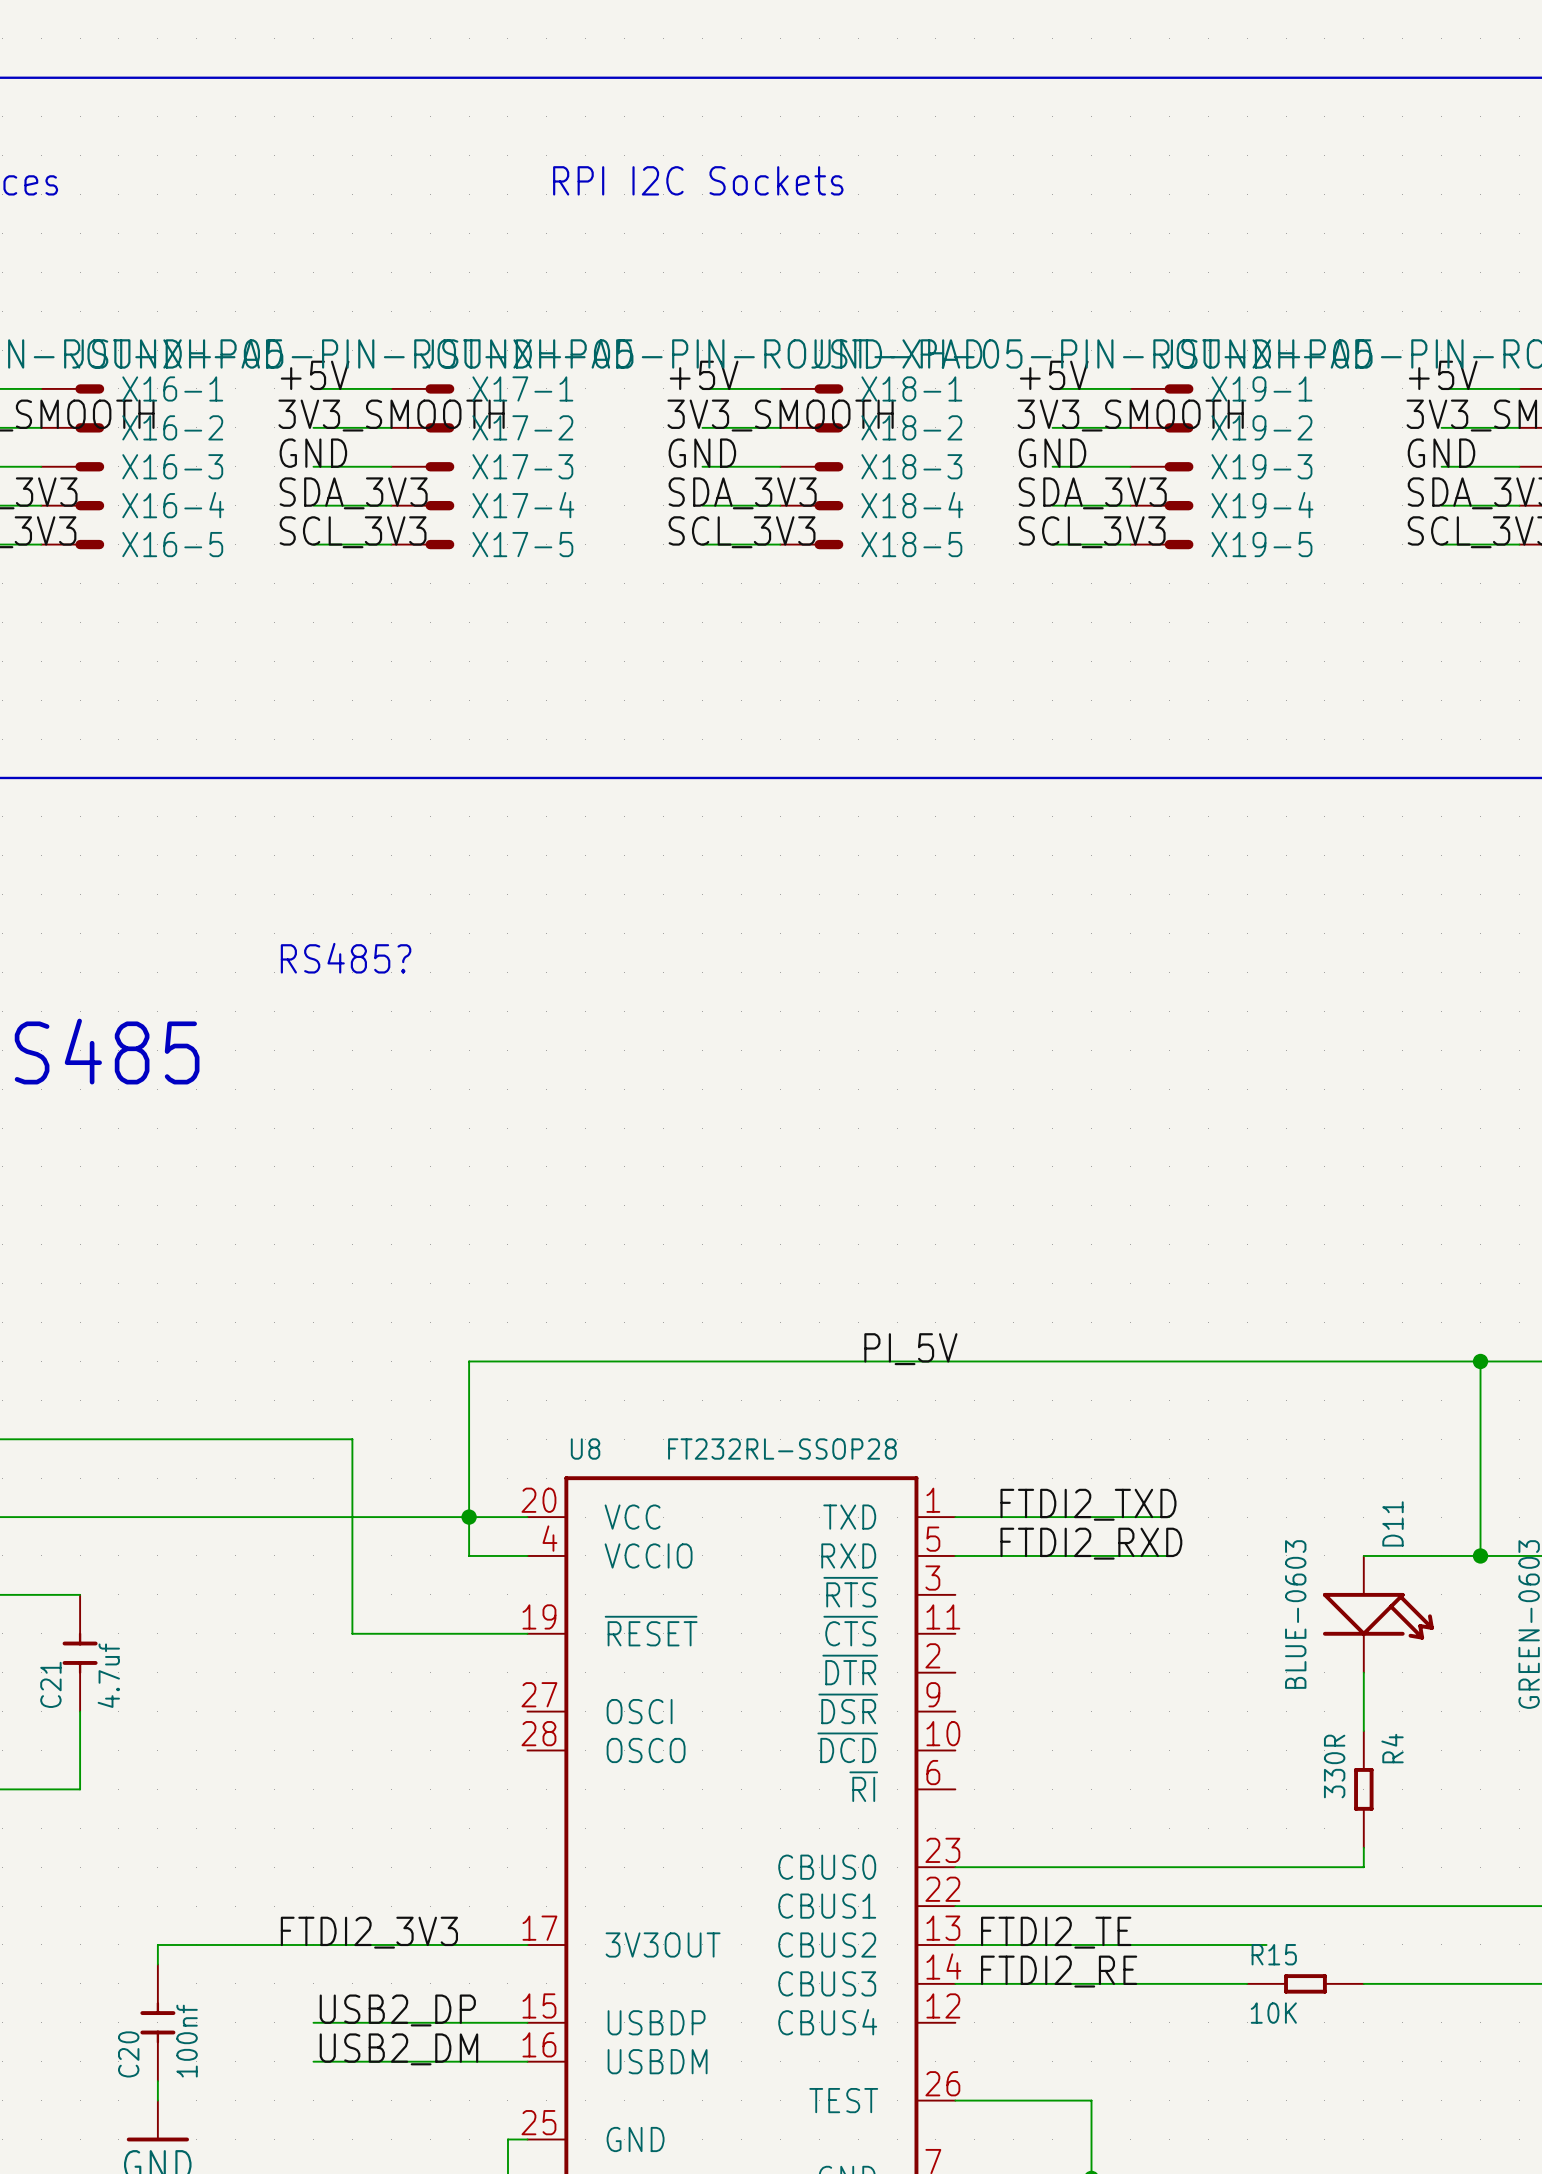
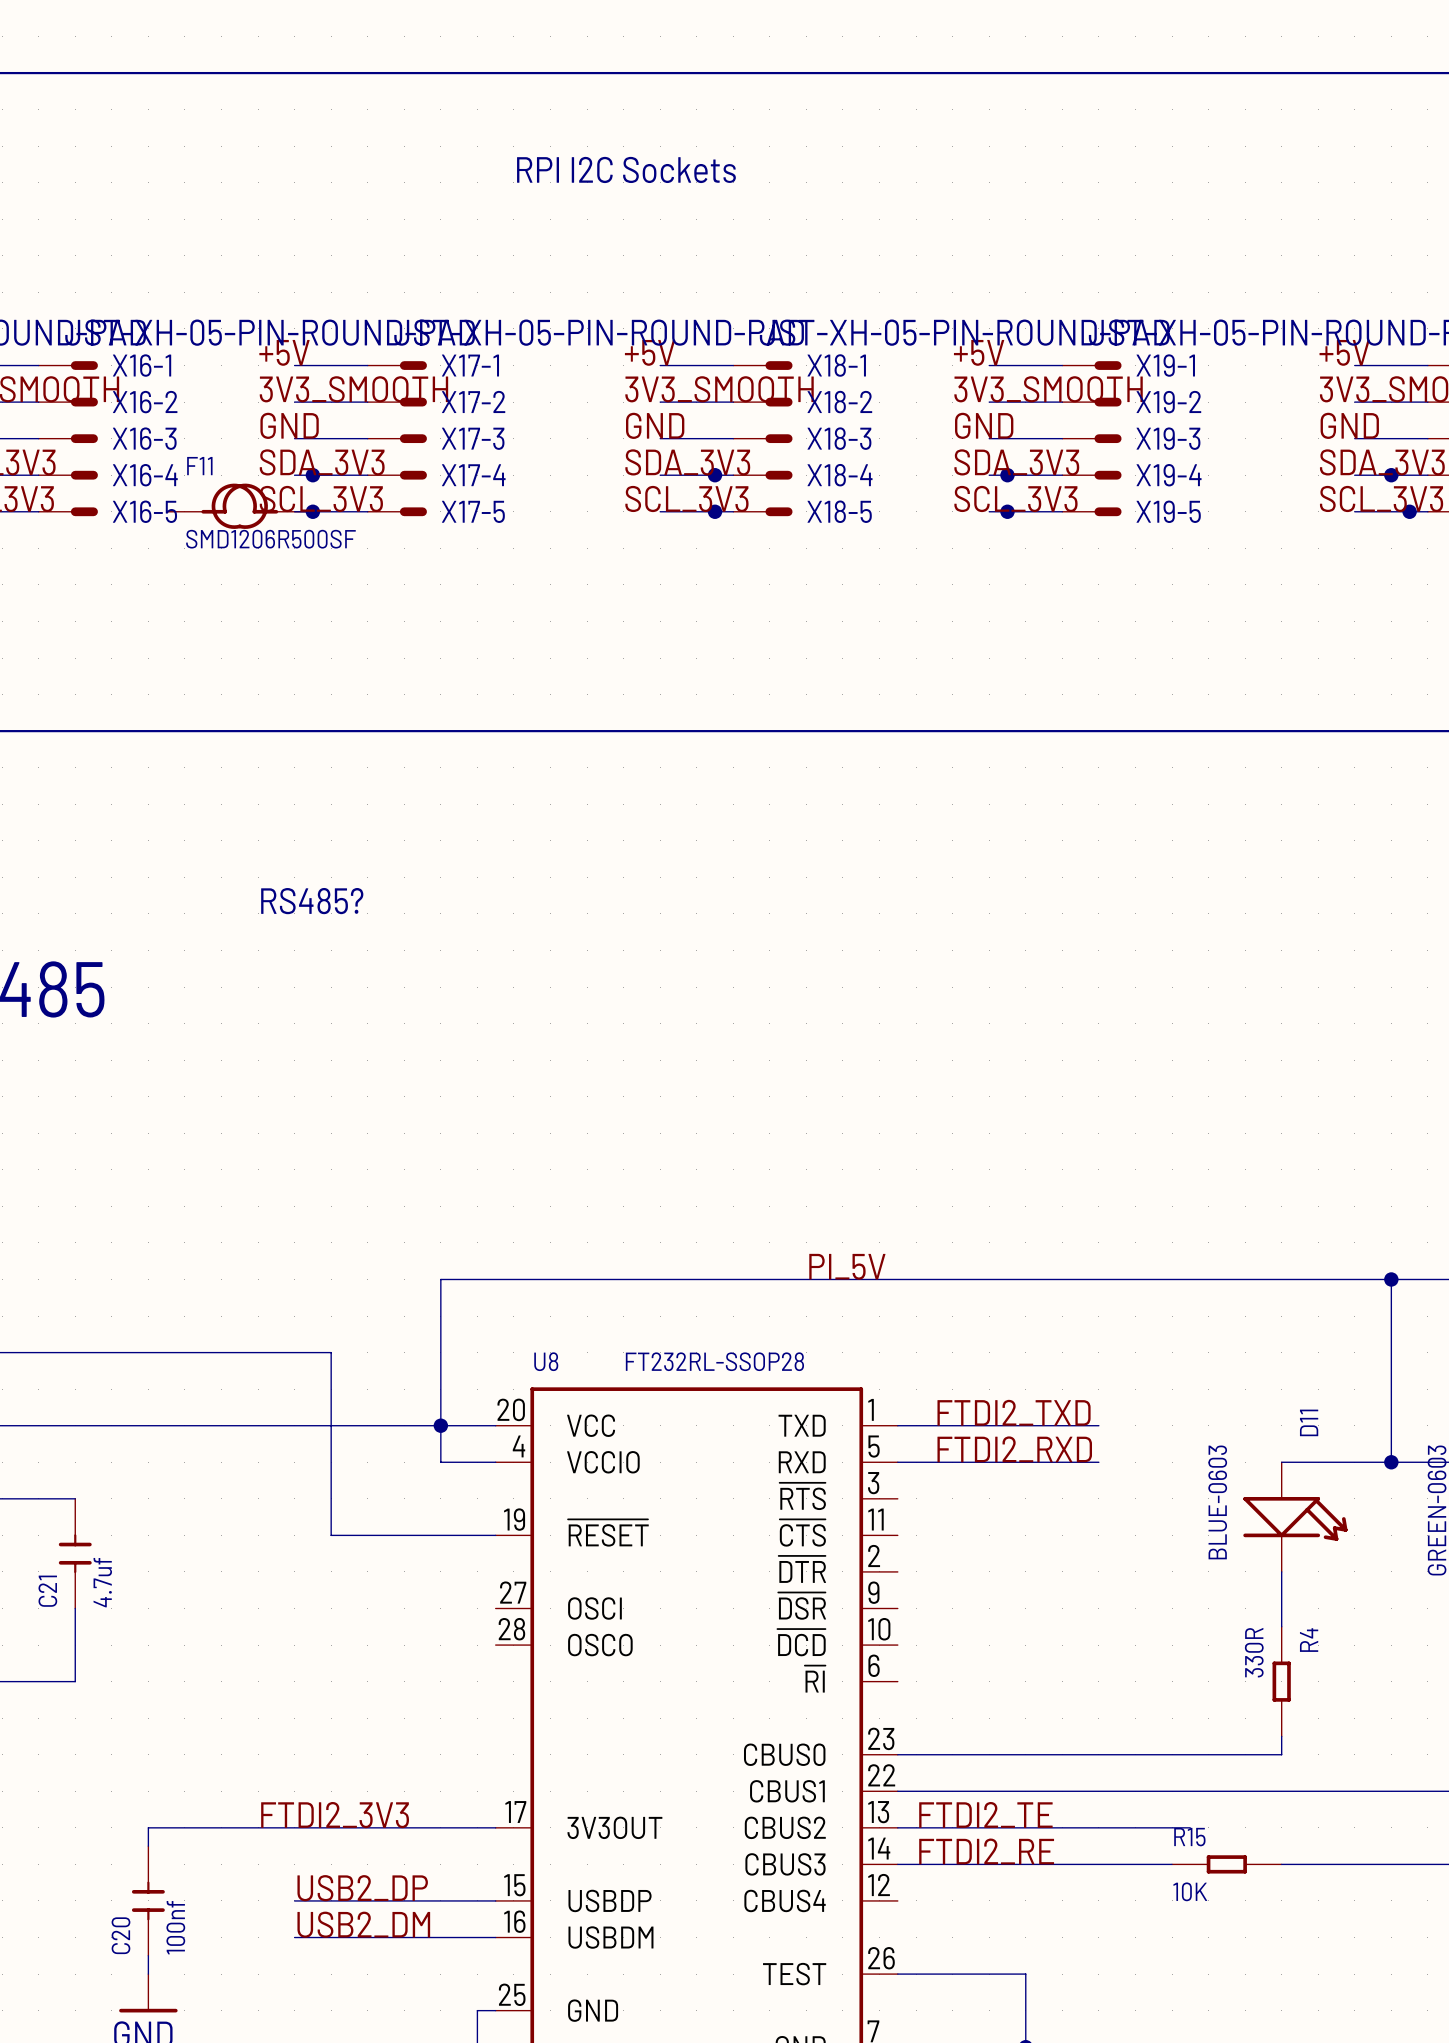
junction: none -> (312, 475)
junction: none -> (715, 475)
junction: none -> (1007, 475)
junction: none -> (1391, 475)
F11: none -> SMD1206R500SF (239, 506)
junction: none -> (312, 511)
junction: none -> (715, 511)
junction: none -> (1007, 511)
junction: none -> (1409, 511)

